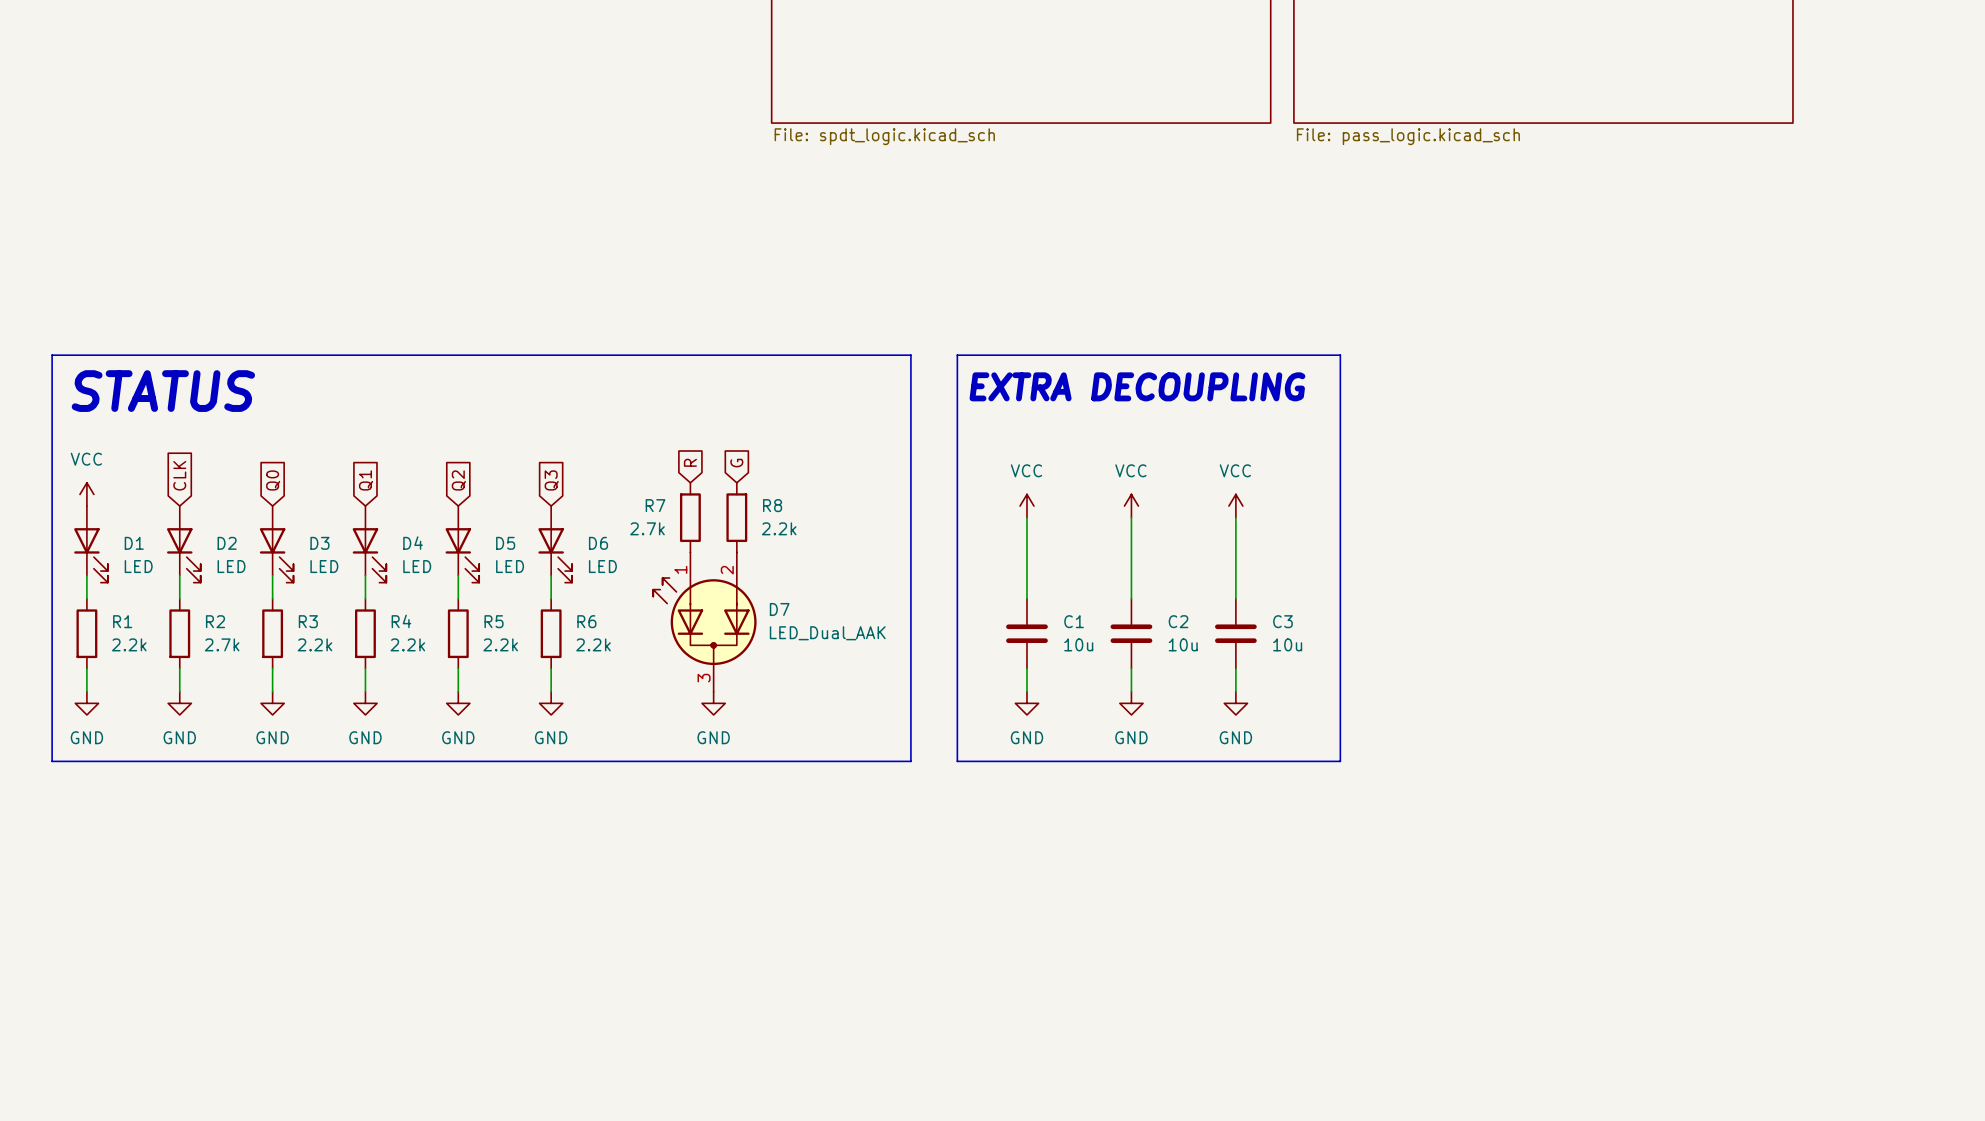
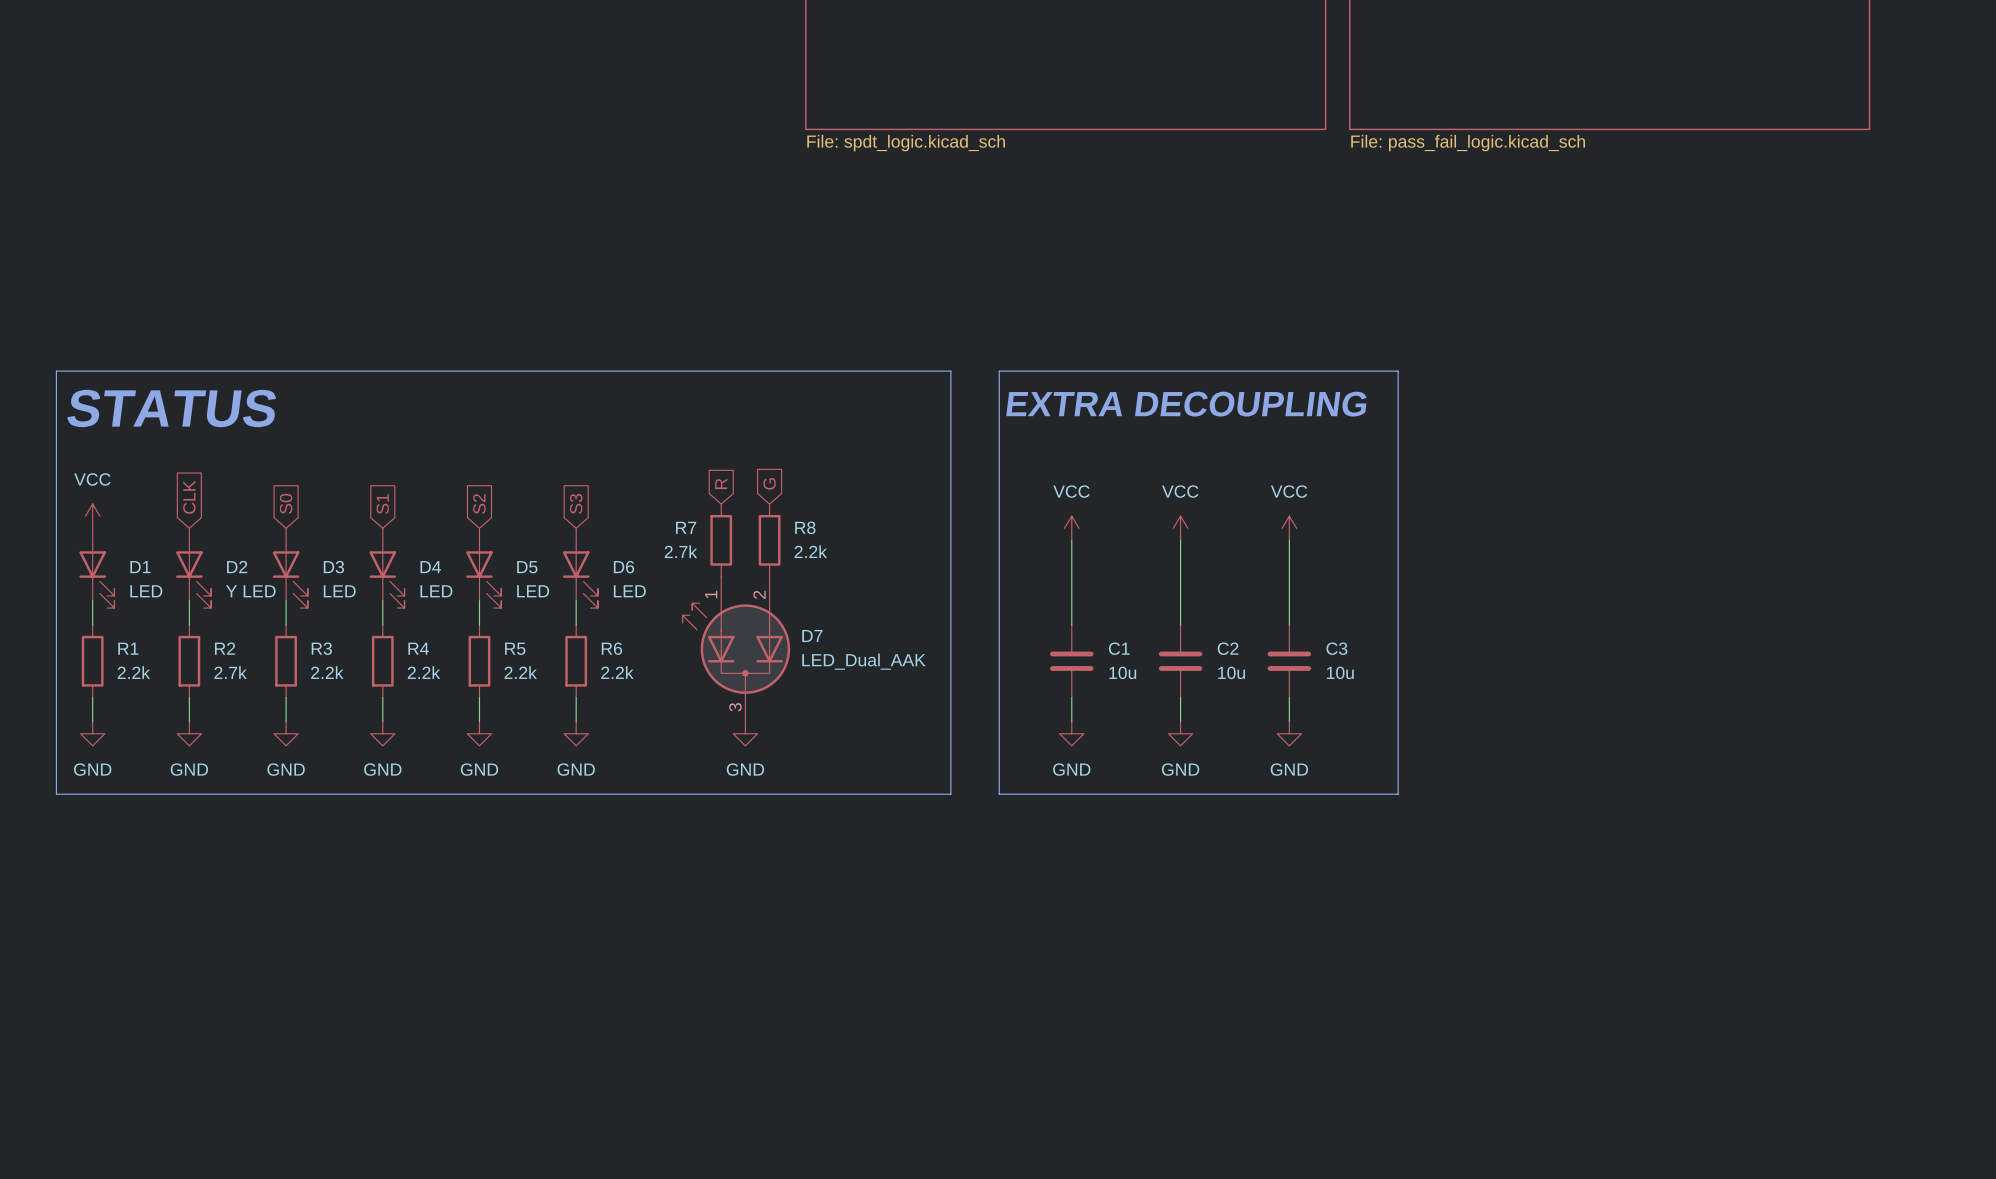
sheet value: File: pass_logic.kicad_sch (1408, 136) -> File: pass_fail_logic.kicad_sch (1468, 143)
global label: Q0 (273, 480) -> S0 (286, 503)
global label: Q1 (366, 480) -> S1 (382, 503)
global label: Q2 (458, 480) -> S2 (479, 503)
global label: Q3 (551, 480) -> S3 (576, 503)
D2 value: LED (231, 566) -> Y LED (250, 591)

